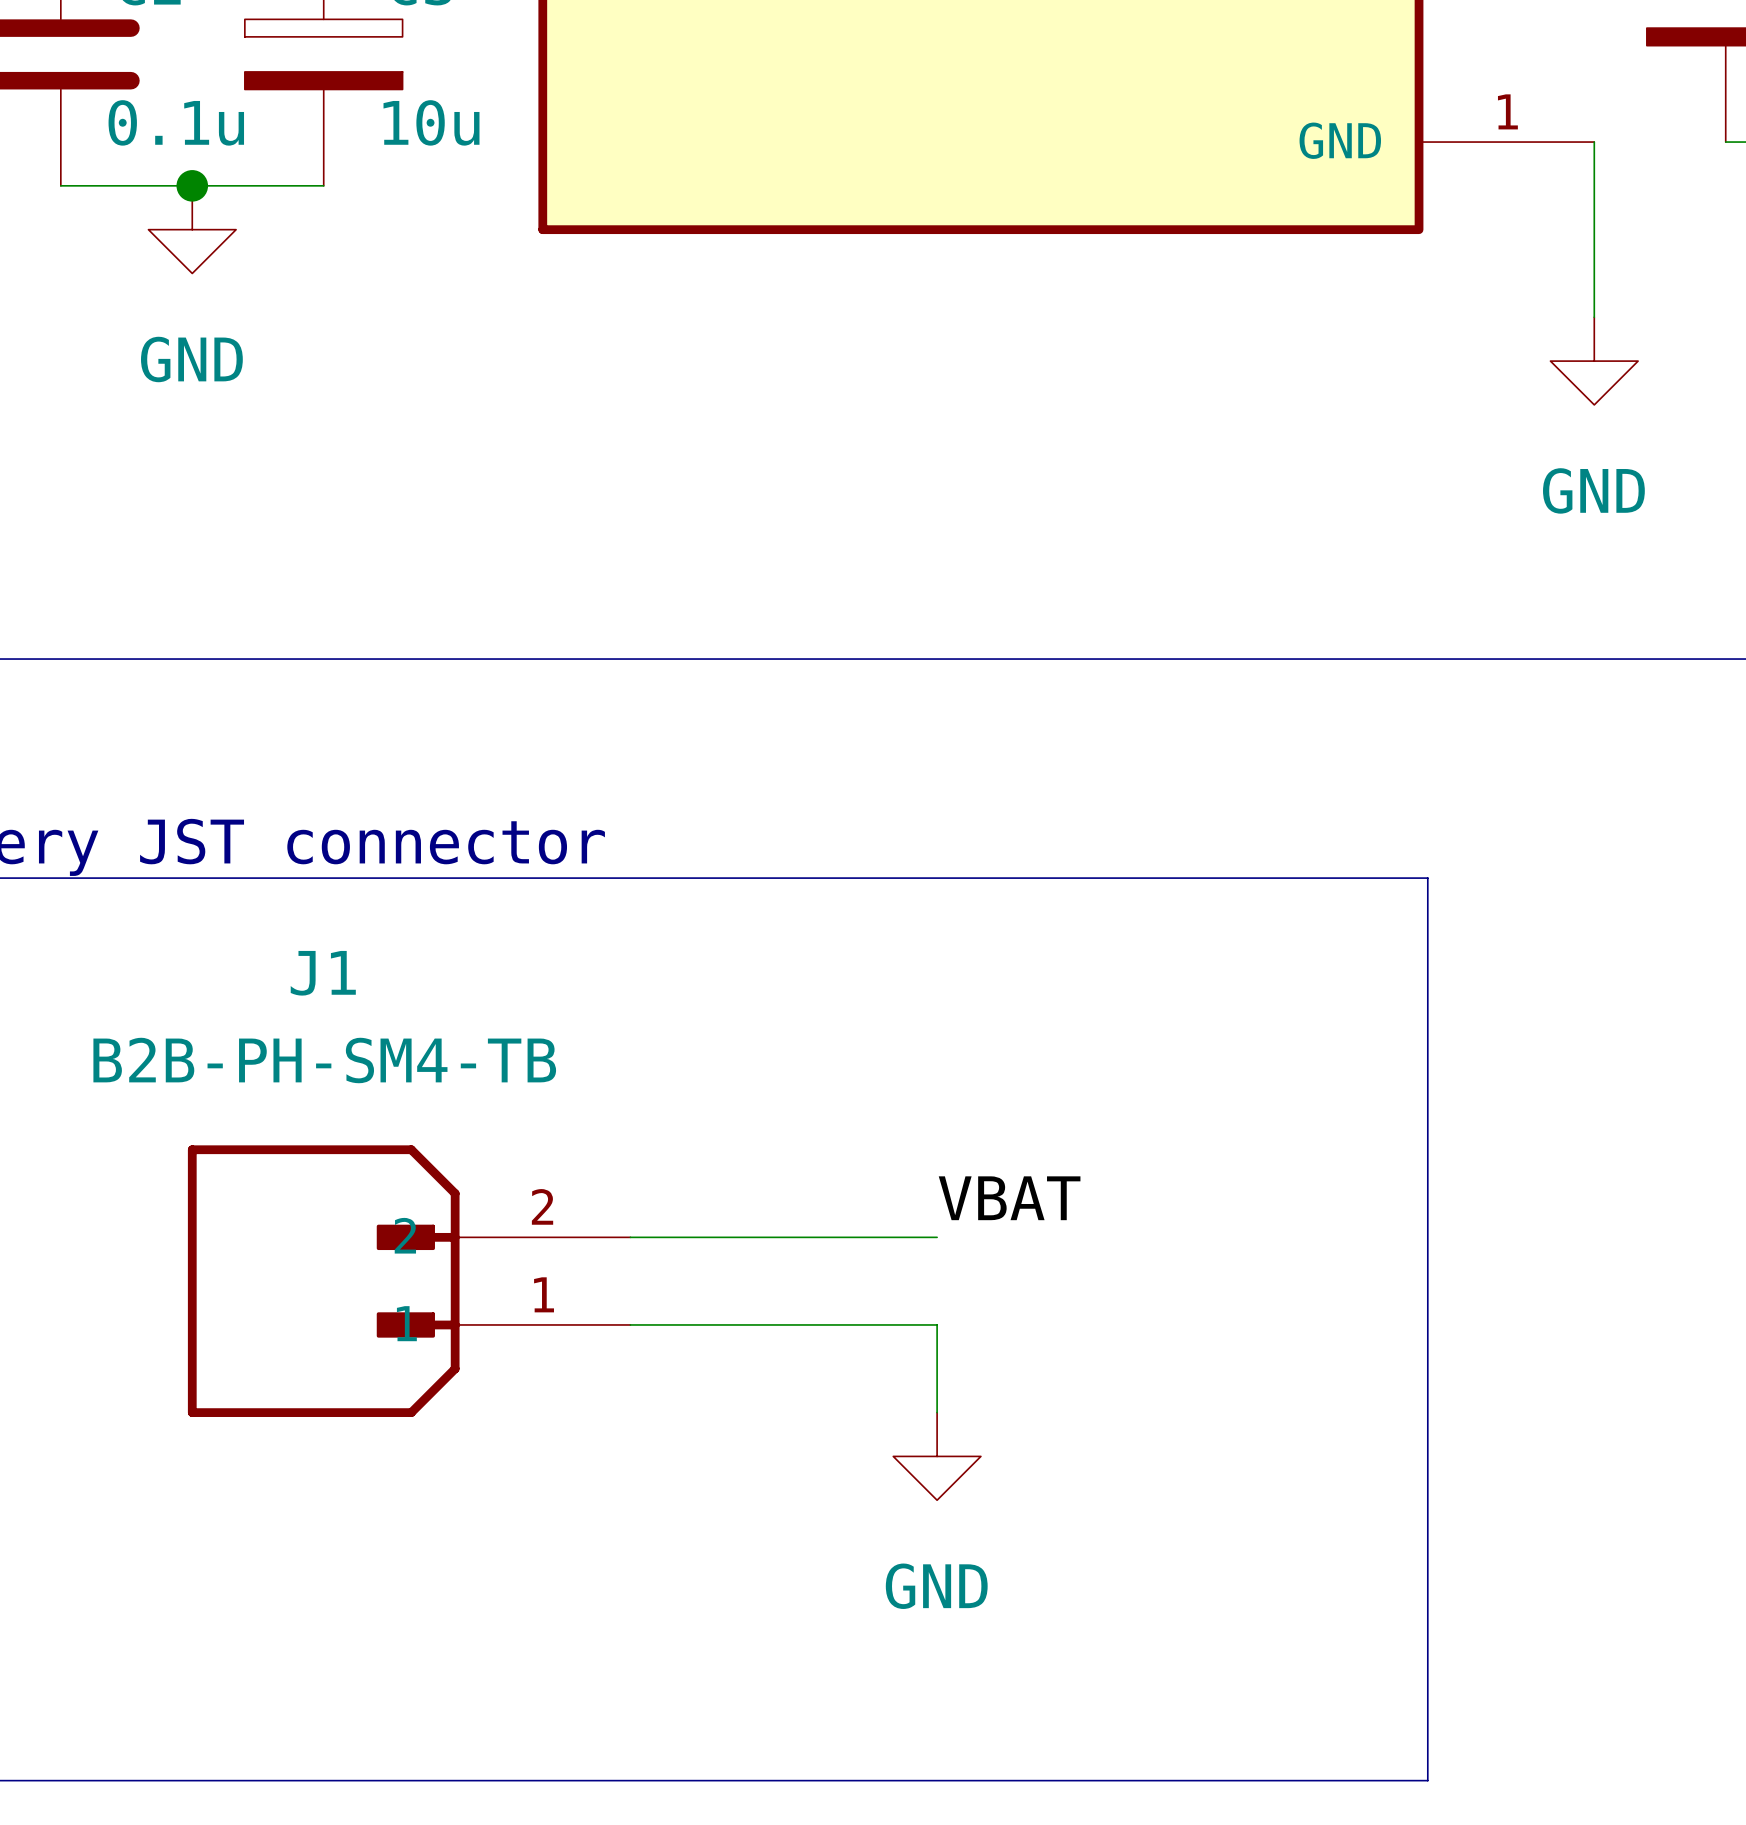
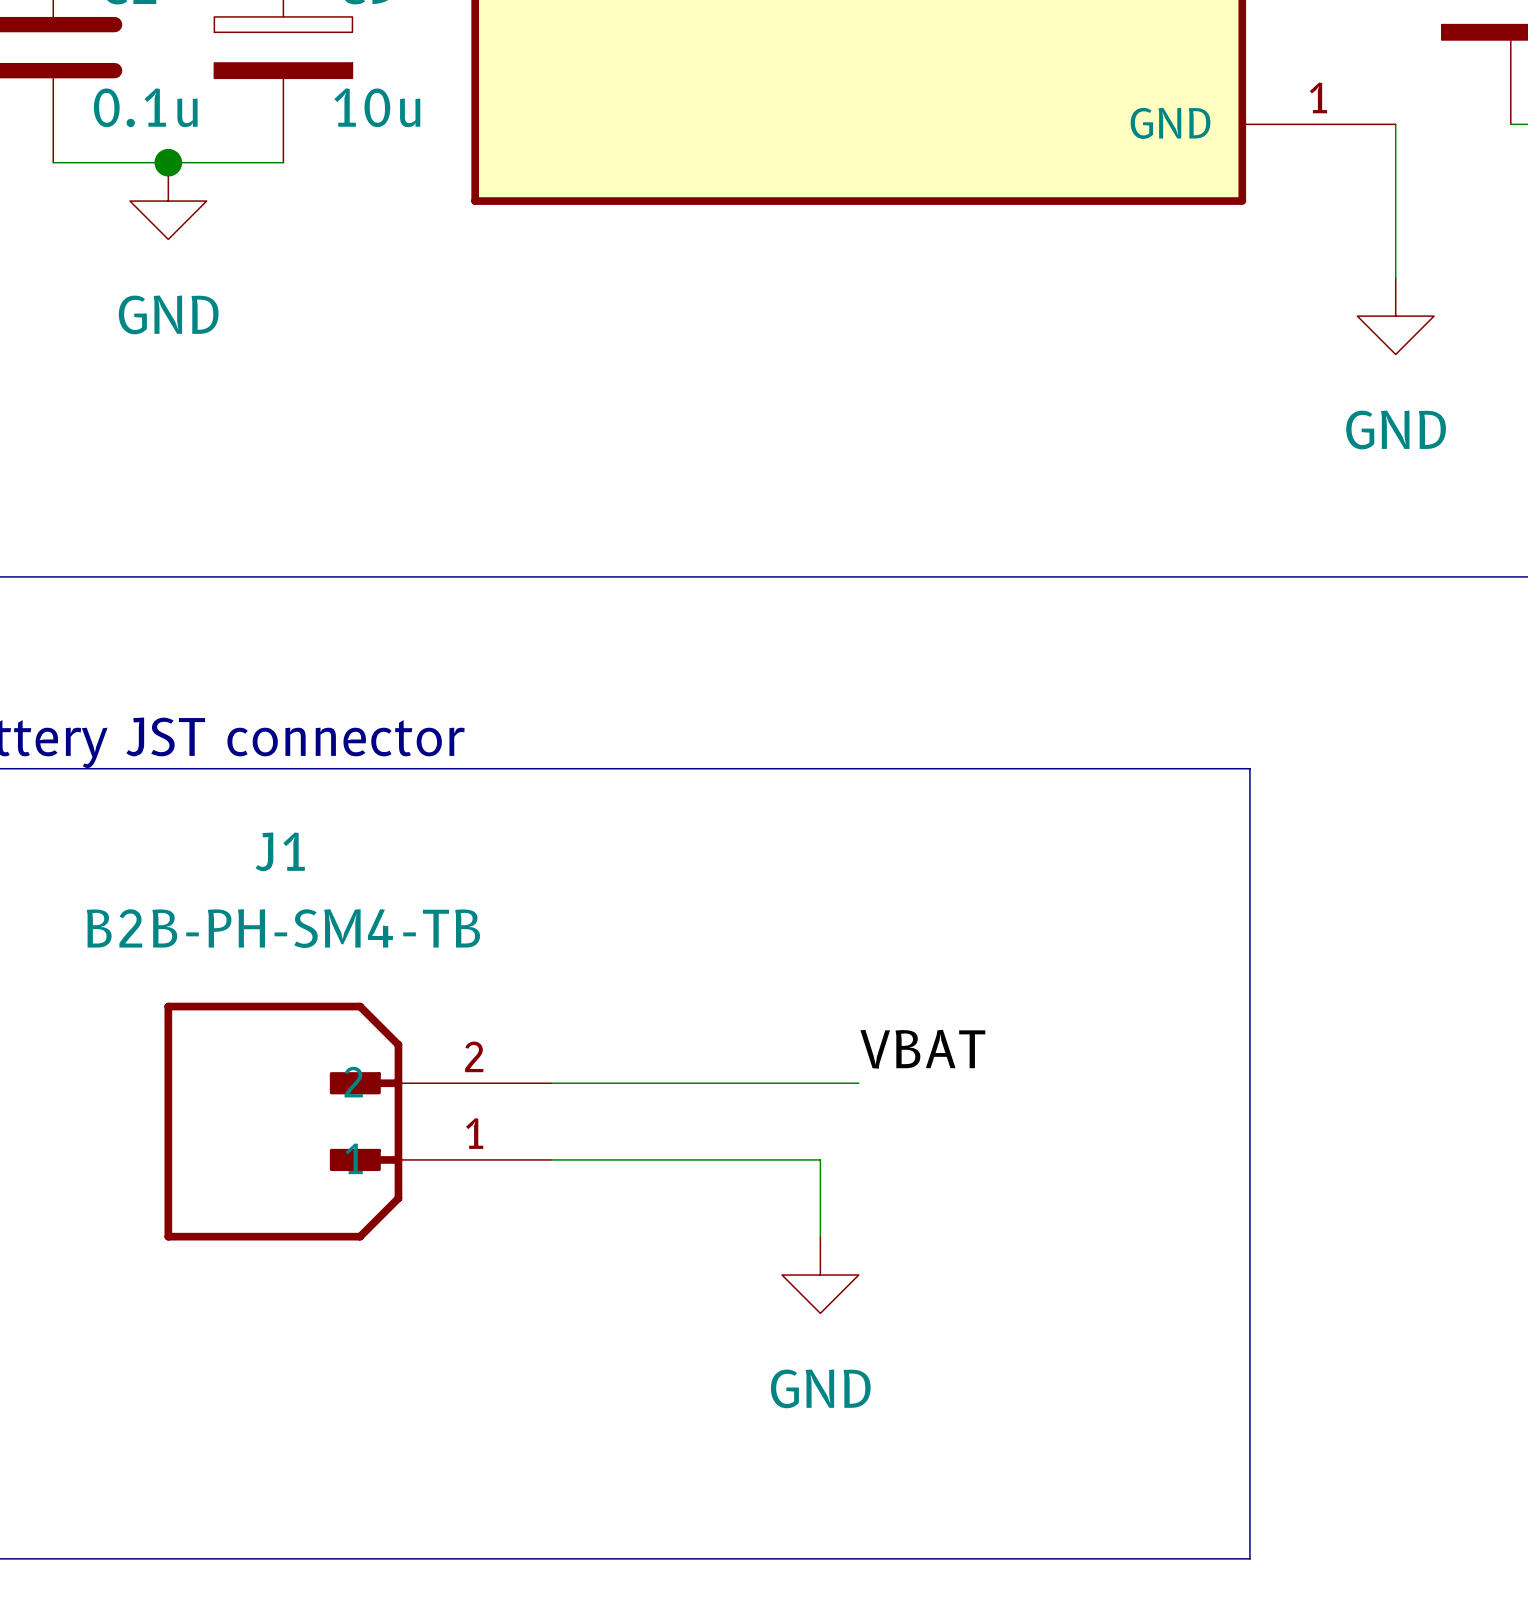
label position: VBAT (1009, 1198) -> VBAT (922, 1049)
wire: none -> (820, 1083) (858, 1083)

